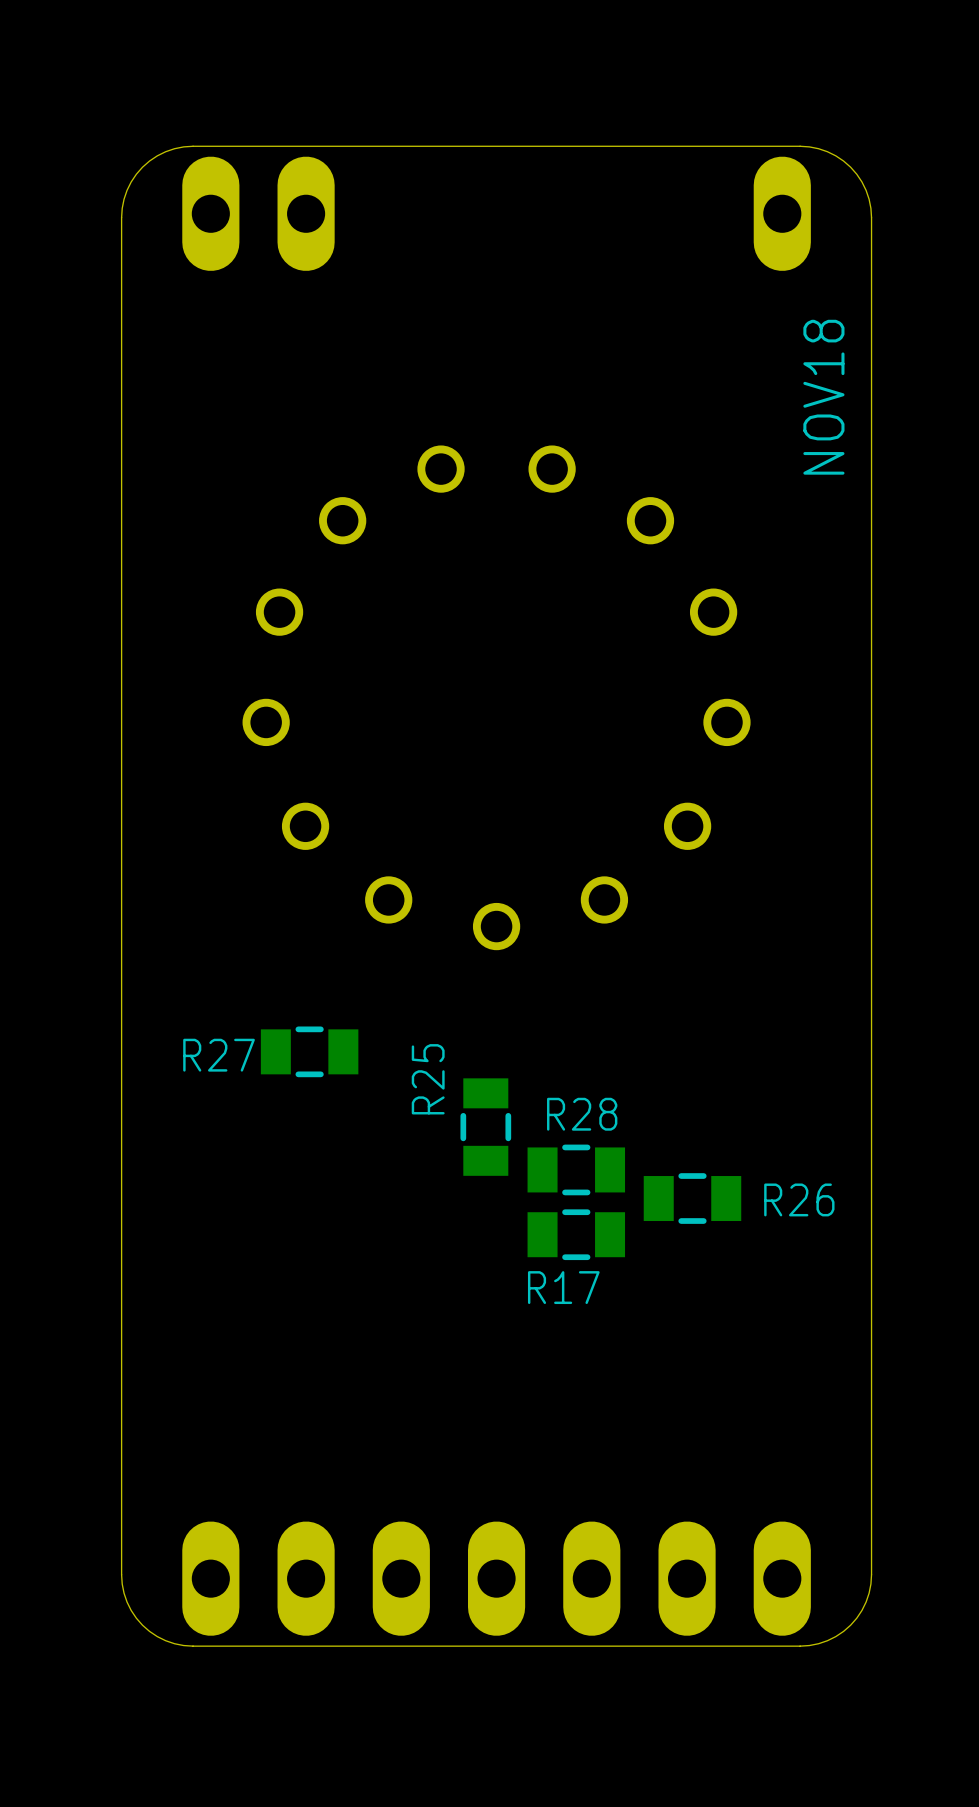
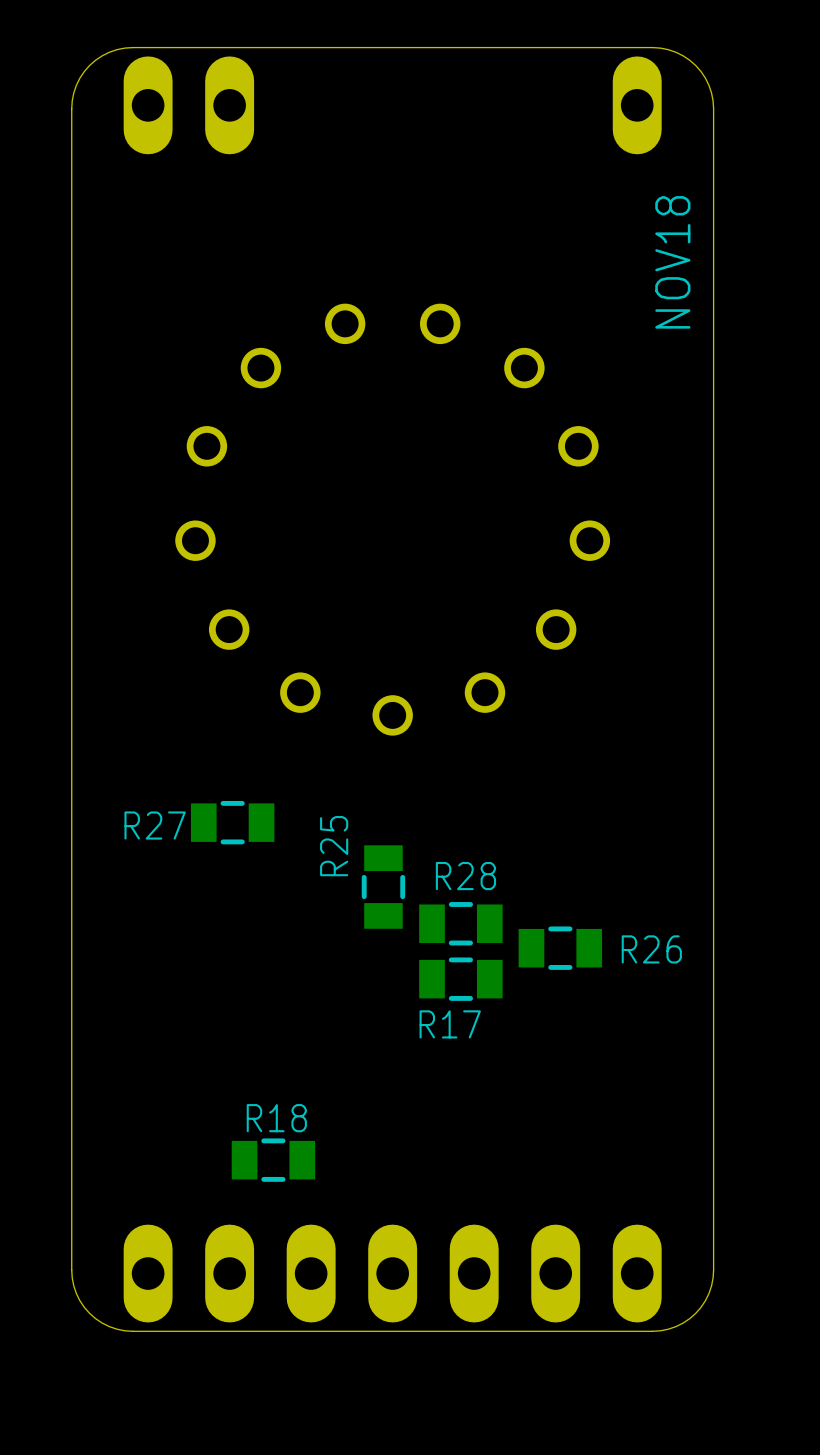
R18: none -> (273, 1160)

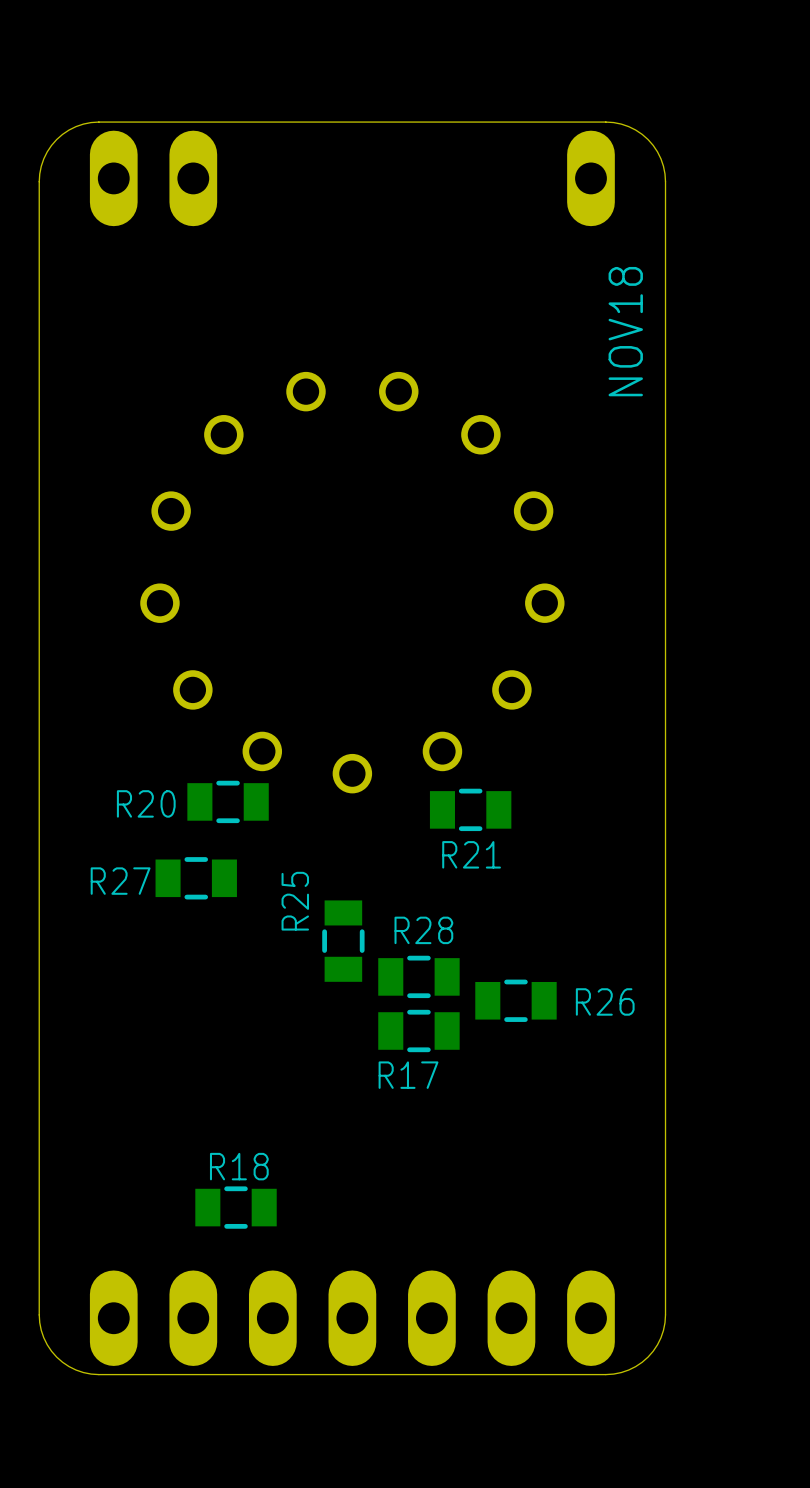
R20: none -> (228, 801)
R21: none -> (470, 809)

